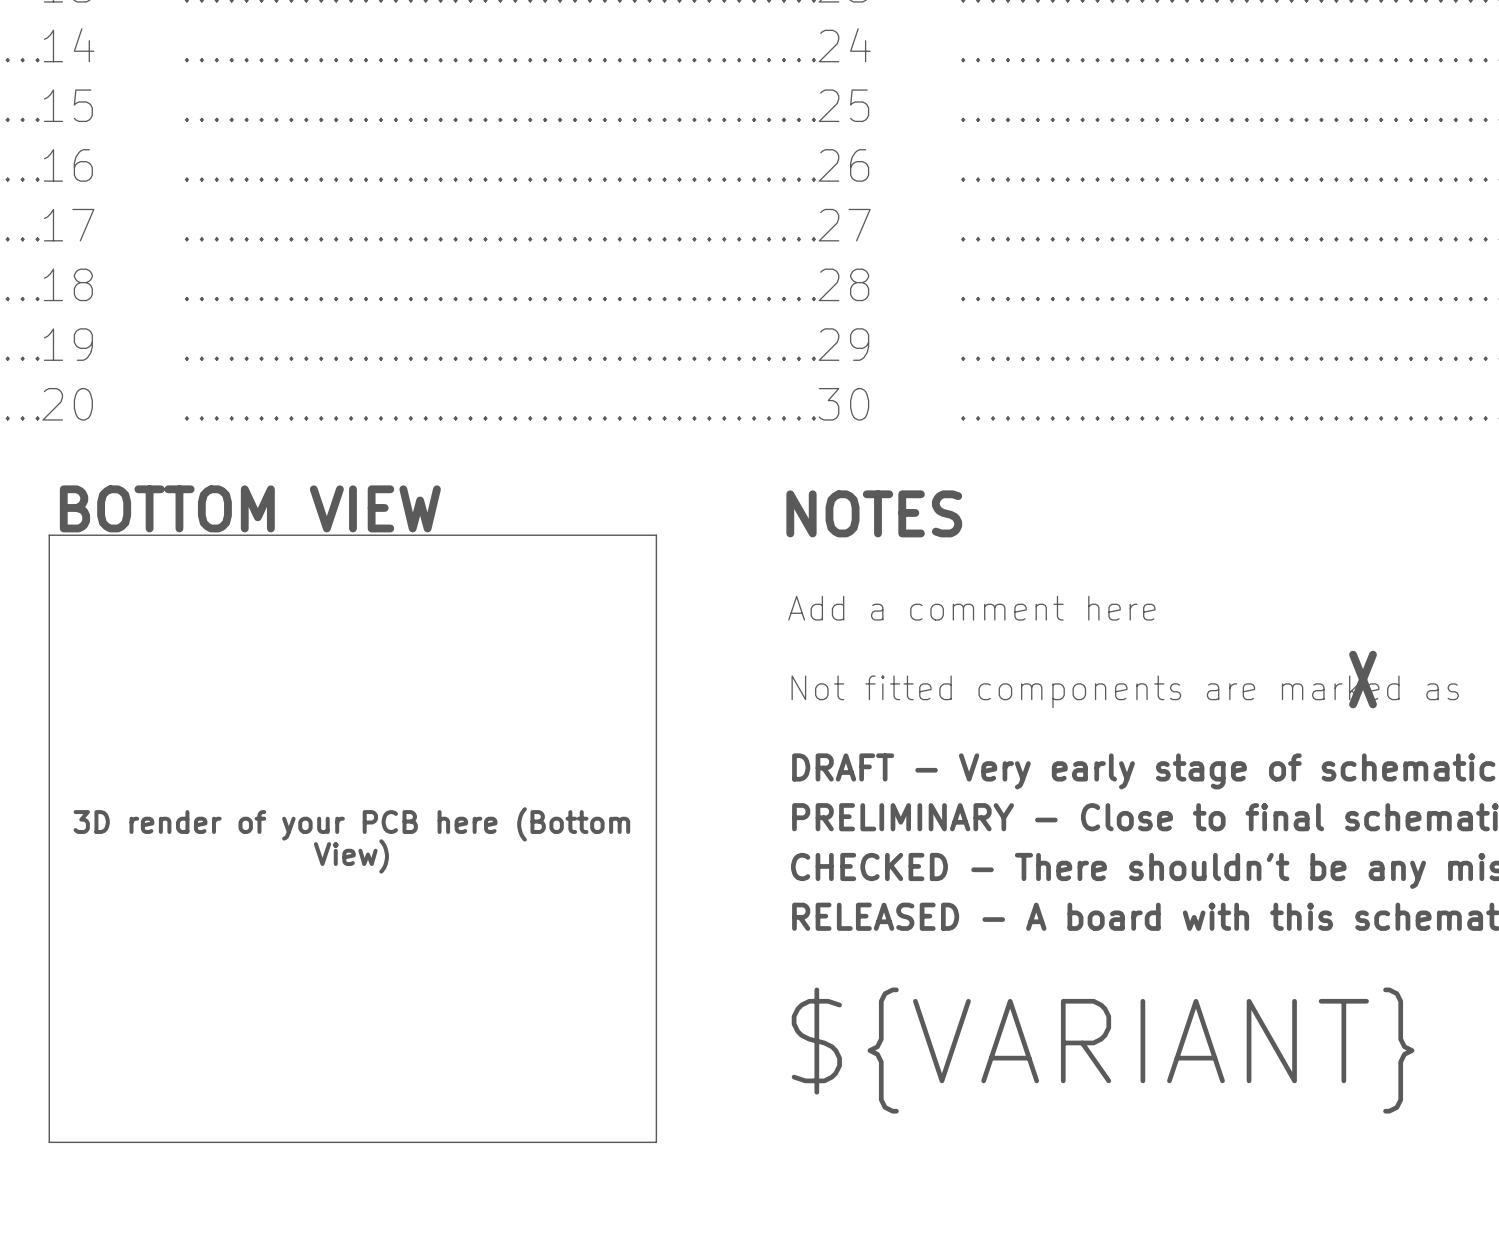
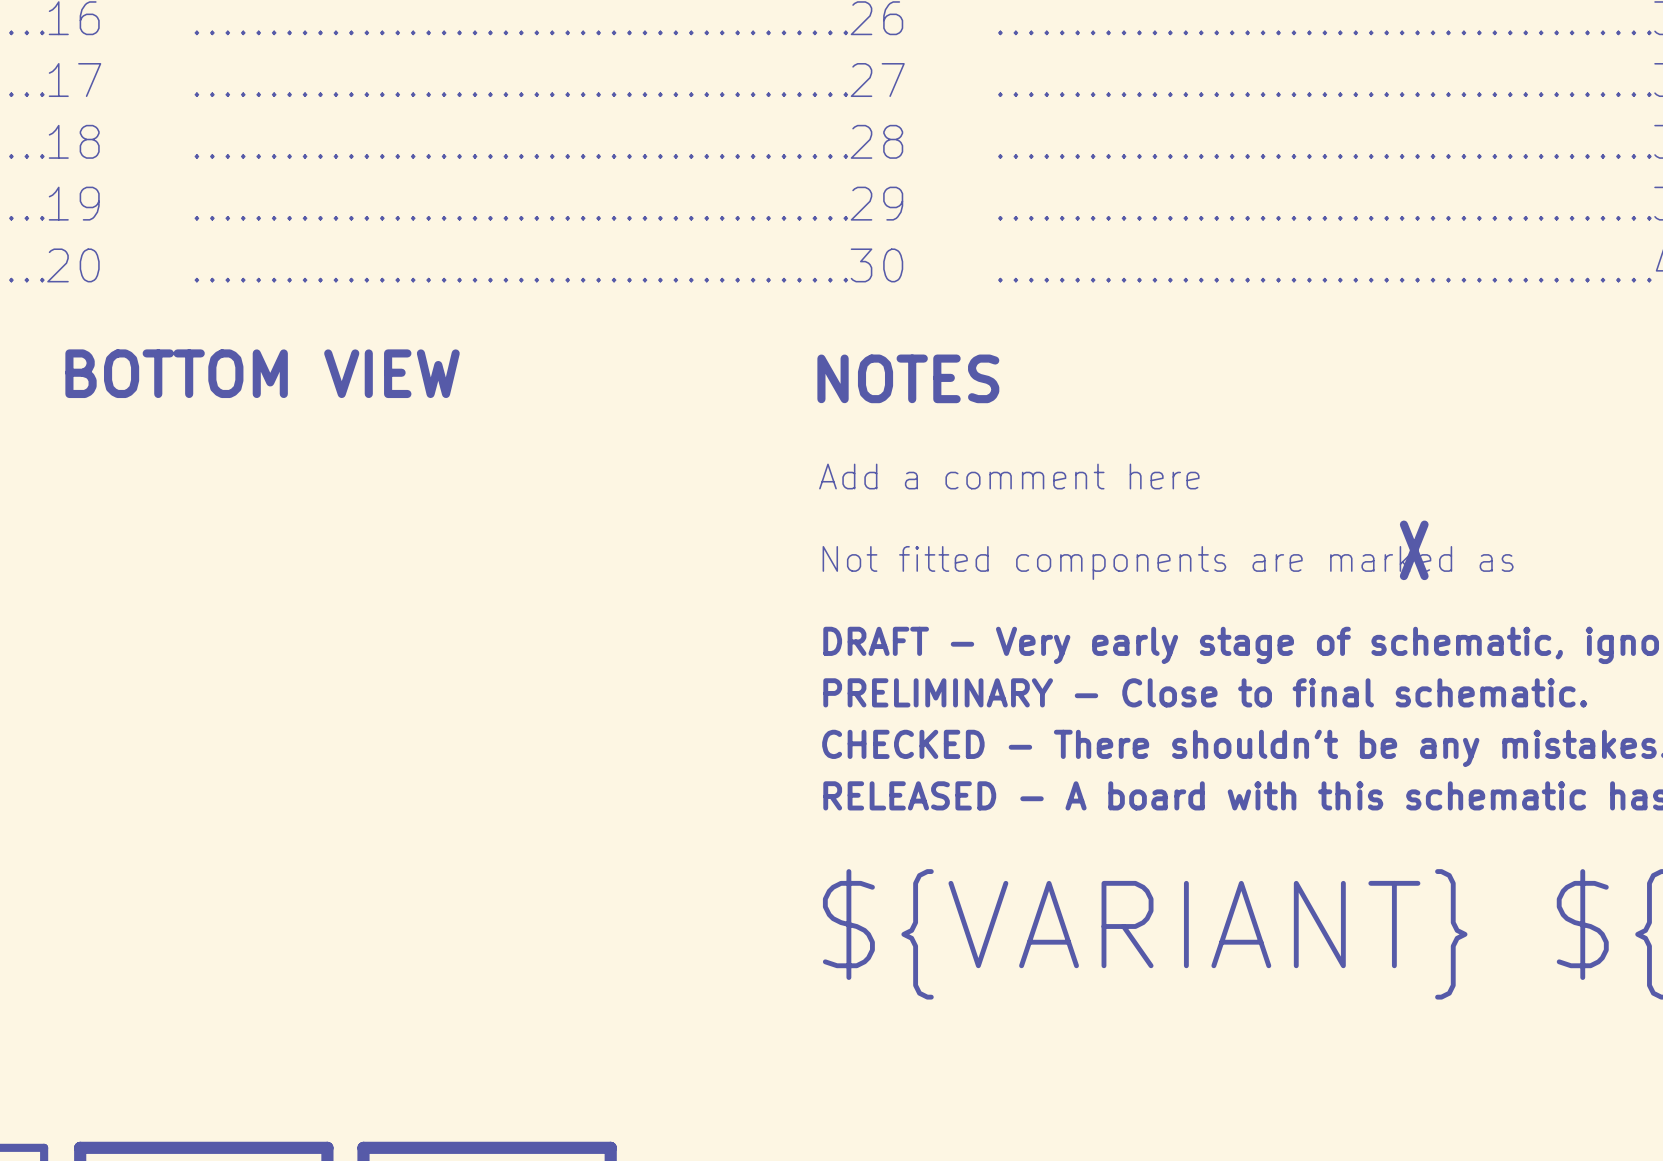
line: (49, 535) (656, 535) (656, 1142) (49, 1142) (49, 535) -> none
text: 3D render of your PCB here (Bottom (351, 824) -> none
text: View) (351, 856) -> none

